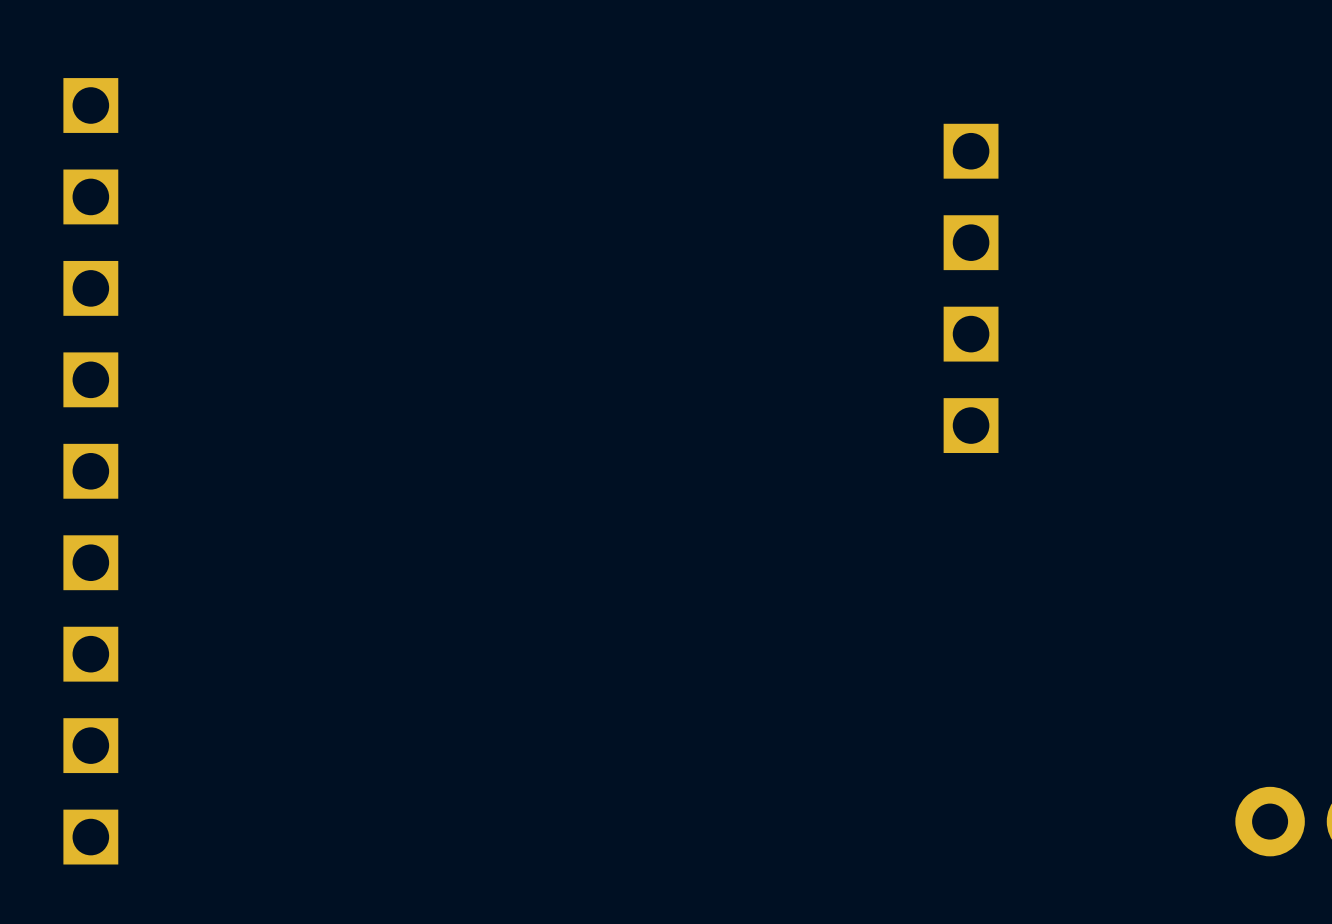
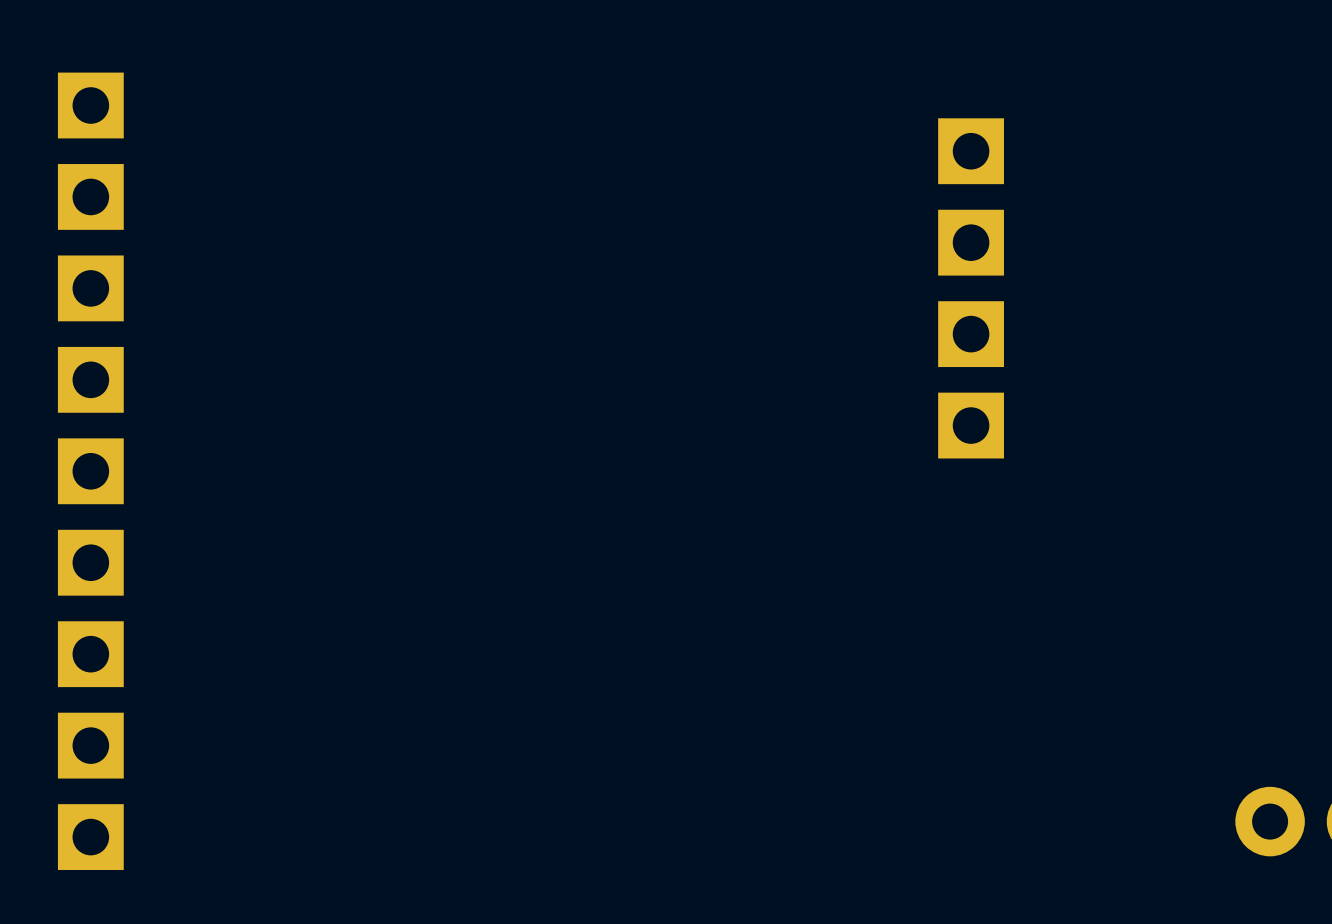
part footprint: [63, 78, 119, 865] -> [57, 72, 124, 870]
part footprint: [943, 123, 999, 453] -> [938, 118, 1004, 459]

